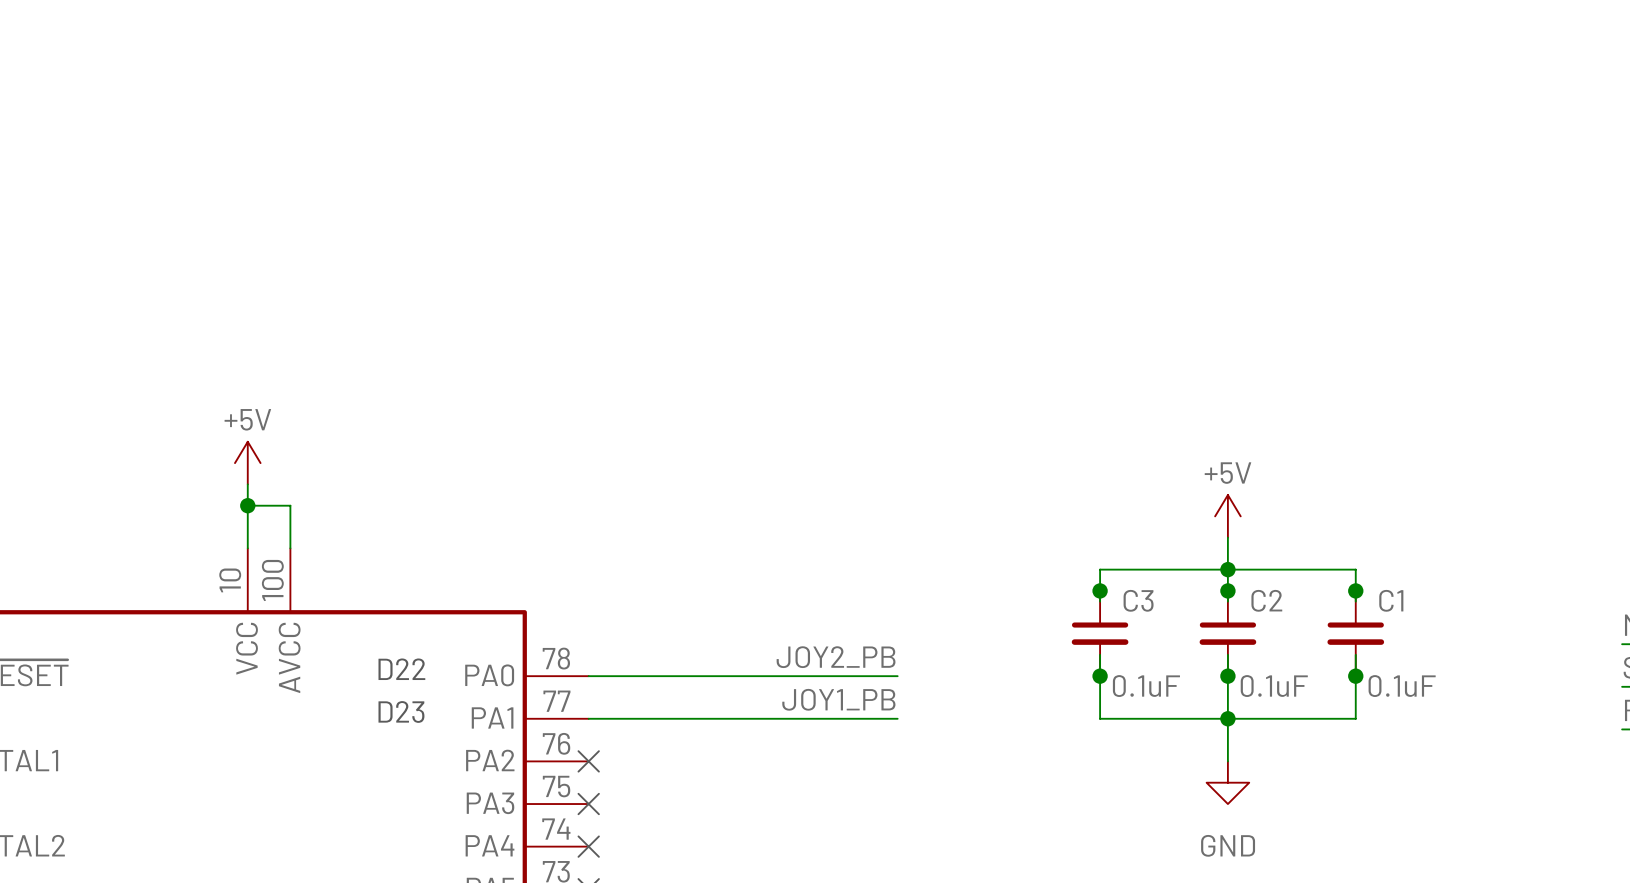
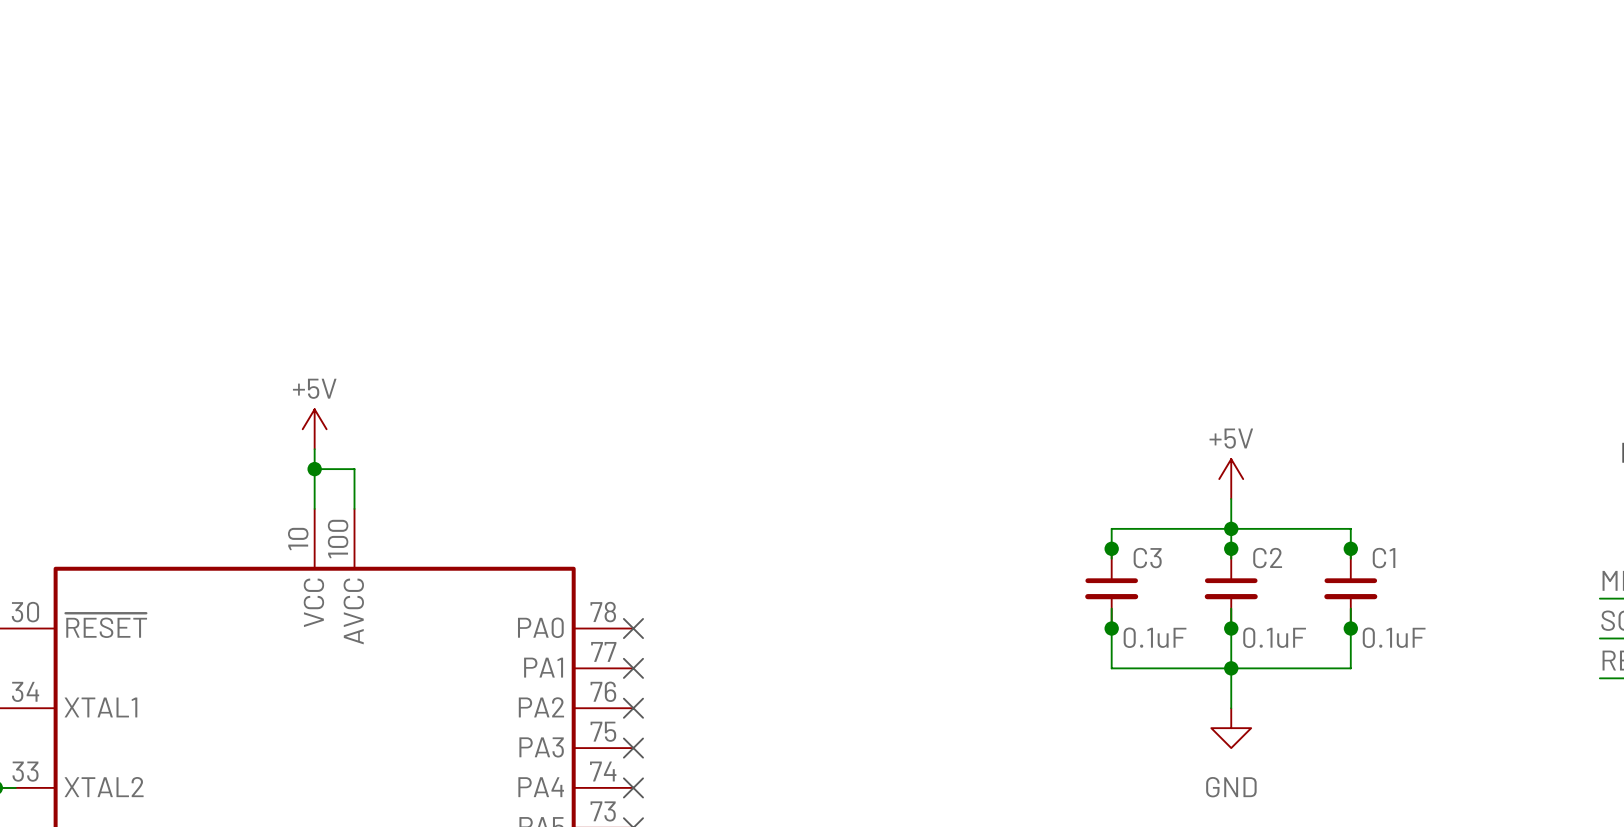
label: JOY2_PB (836, 657) -> none
text: D22 (401, 669) -> none
wire: (588, 676) (897, 676) -> none
no-connect mark: none -> (633, 628)
label: JOY1_PB (838, 699) -> none
text: D23 (401, 711) -> none
wire: (588, 718) (897, 718) -> none
no-connect mark: none -> (633, 668)

